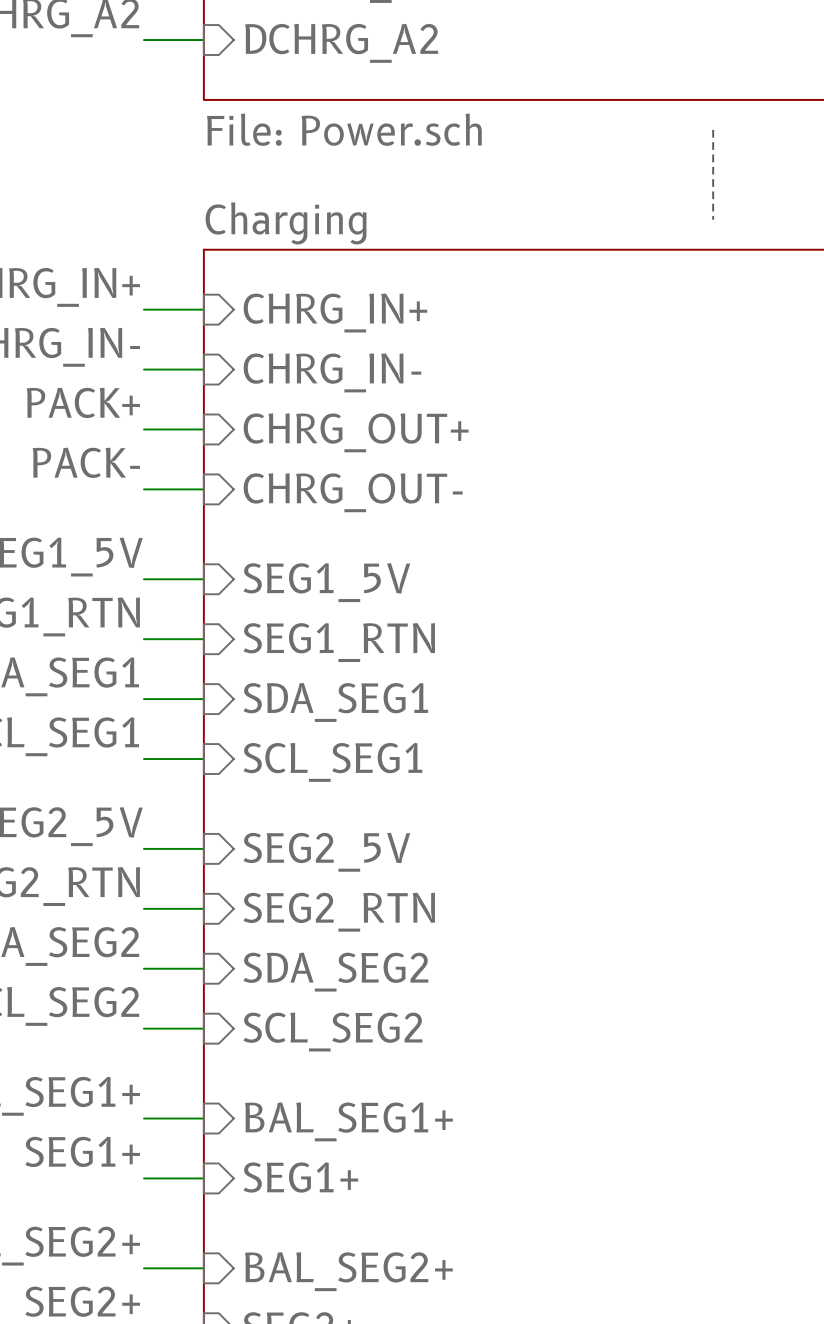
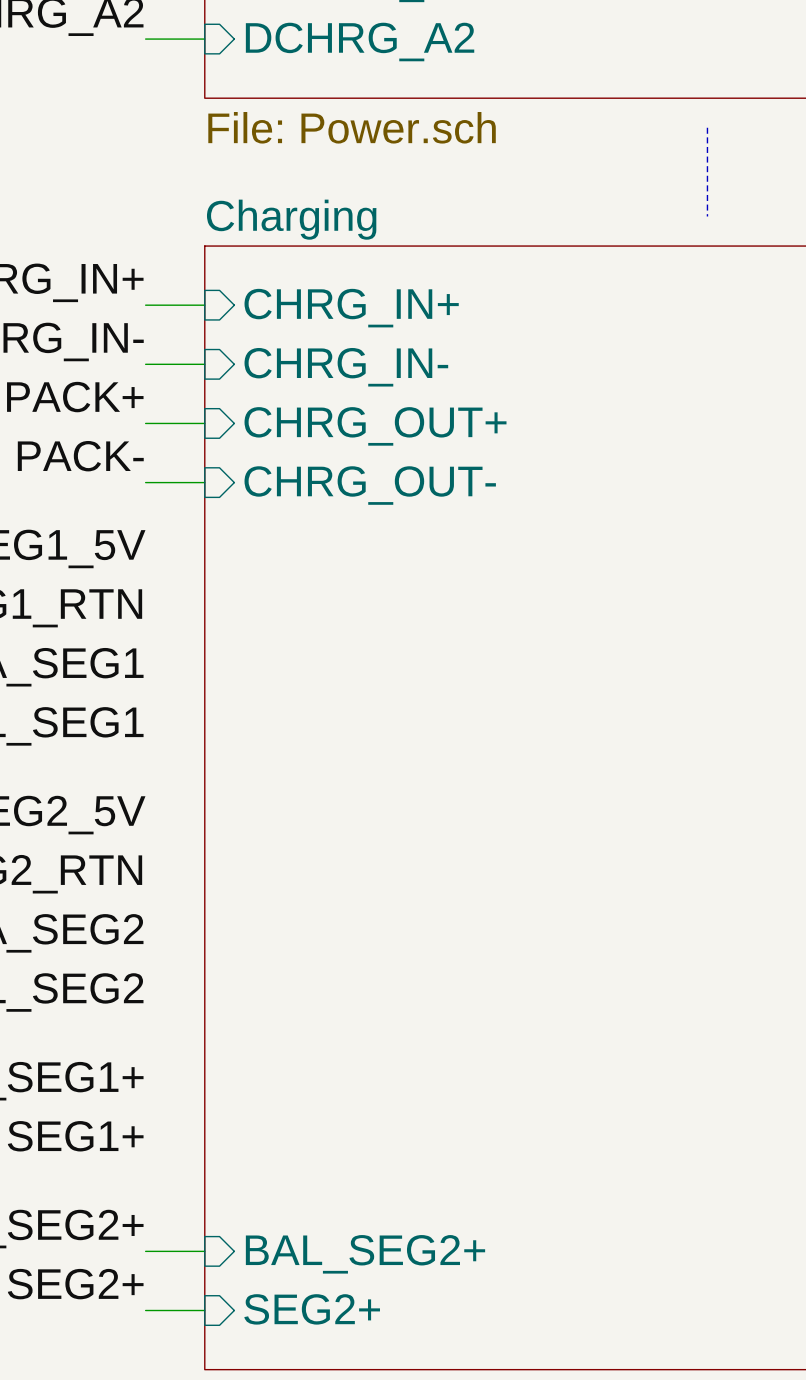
wire: (143, 579) (203, 579) -> none
sheet pin: SEG1_5V (326, 582) -> none
wire: (143, 639) (203, 639) -> none
sheet pin: SEG1_RTN (339, 642) -> none
wire: (143, 699) (203, 699) -> none
sheet pin: SDA_SEG1 (335, 702) -> none
wire: (143, 759) (203, 759) -> none
sheet pin: SCL_SEG1 (332, 762) -> none
wire: (143, 848) (203, 848) -> none
sheet pin: SEG2_5V (326, 852) -> none
wire: (143, 908) (203, 908) -> none
sheet pin: SEG2_RTN (339, 912) -> none
wire: (143, 968) (203, 968) -> none
sheet pin: SDA_SEG2 (335, 972) -> none
wire: (143, 1028) (203, 1028) -> none
sheet pin: SCL_SEG2 (332, 1032) -> none
wire: (143, 1118) (203, 1118) -> none
sheet pin: BAL_SEG1+ (348, 1121) -> none
sheet pin: SEG1+ (300, 1177) -> none
wire: (143, 1178) (203, 1178) -> none

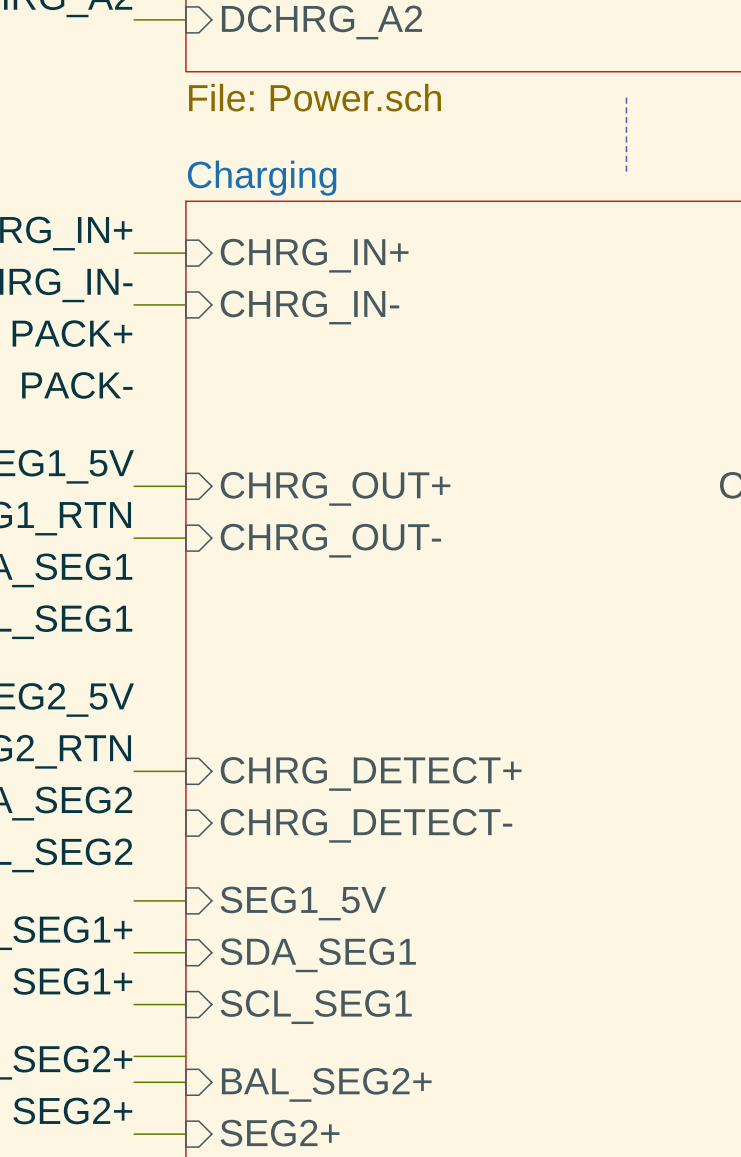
wire: (145, 423) (204, 423) -> (134, 486) (185, 486)
sheet pin position: CHRG_OUT+ (375, 426) -> CHRG_OUT+ (335, 488)
wire: (145, 482) (204, 482) -> (134, 538) (185, 538)
sheet pin position: CHRG_OUT- (370, 485) -> CHRG_OUT- (330, 540)
wire: none -> (134, 771) (185, 771)
sheet pin: none -> CHRG_DETECT+ (371, 773)
sheet pin: none -> CHRG_DETECT- (366, 825)
wire: none -> (134, 900) (185, 900)
sheet pin: none -> SEG1_5V (303, 903)
wire: none -> (134, 952) (185, 952)
sheet pin: none -> SDA_SEG1 (318, 955)
wire: none -> (134, 1004) (185, 1004)
sheet pin: none -> SCL_SEG1 (316, 1007)
wire: none -> (134, 1056) (185, 1056)

